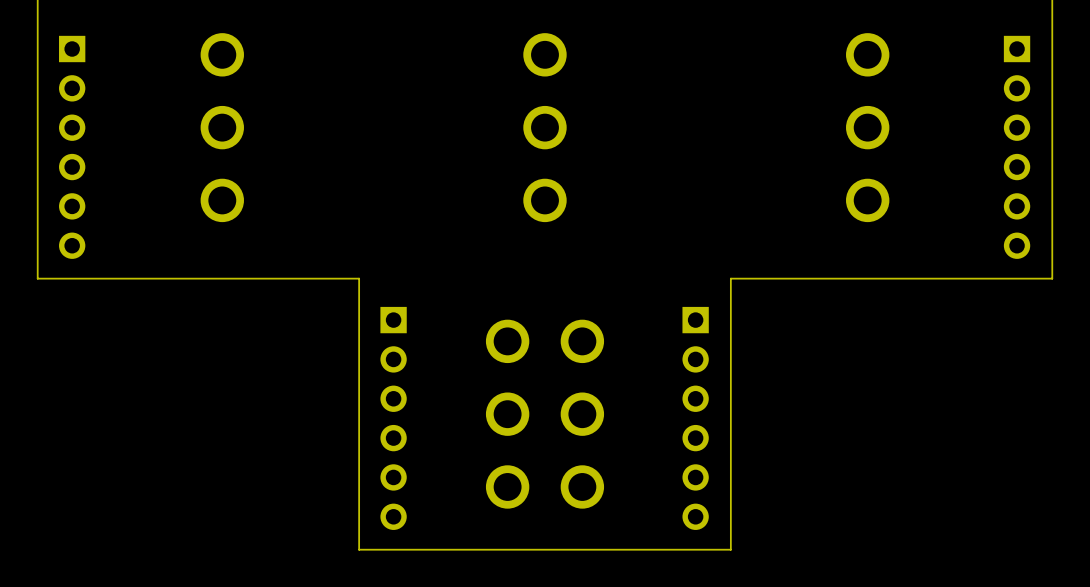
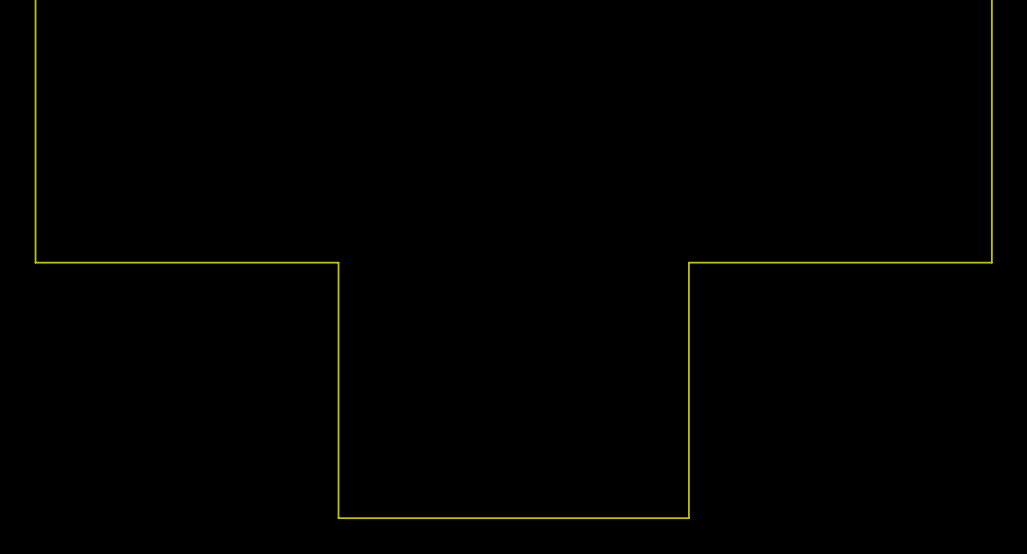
part: (222, 127) -> none
part: (544, 127) -> none
part: (867, 127) -> none
part: (72, 147) -> none
part: (1017, 147) -> none
part: (544, 414) -> none
part: (393, 418) -> none
part: (695, 418) -> none

